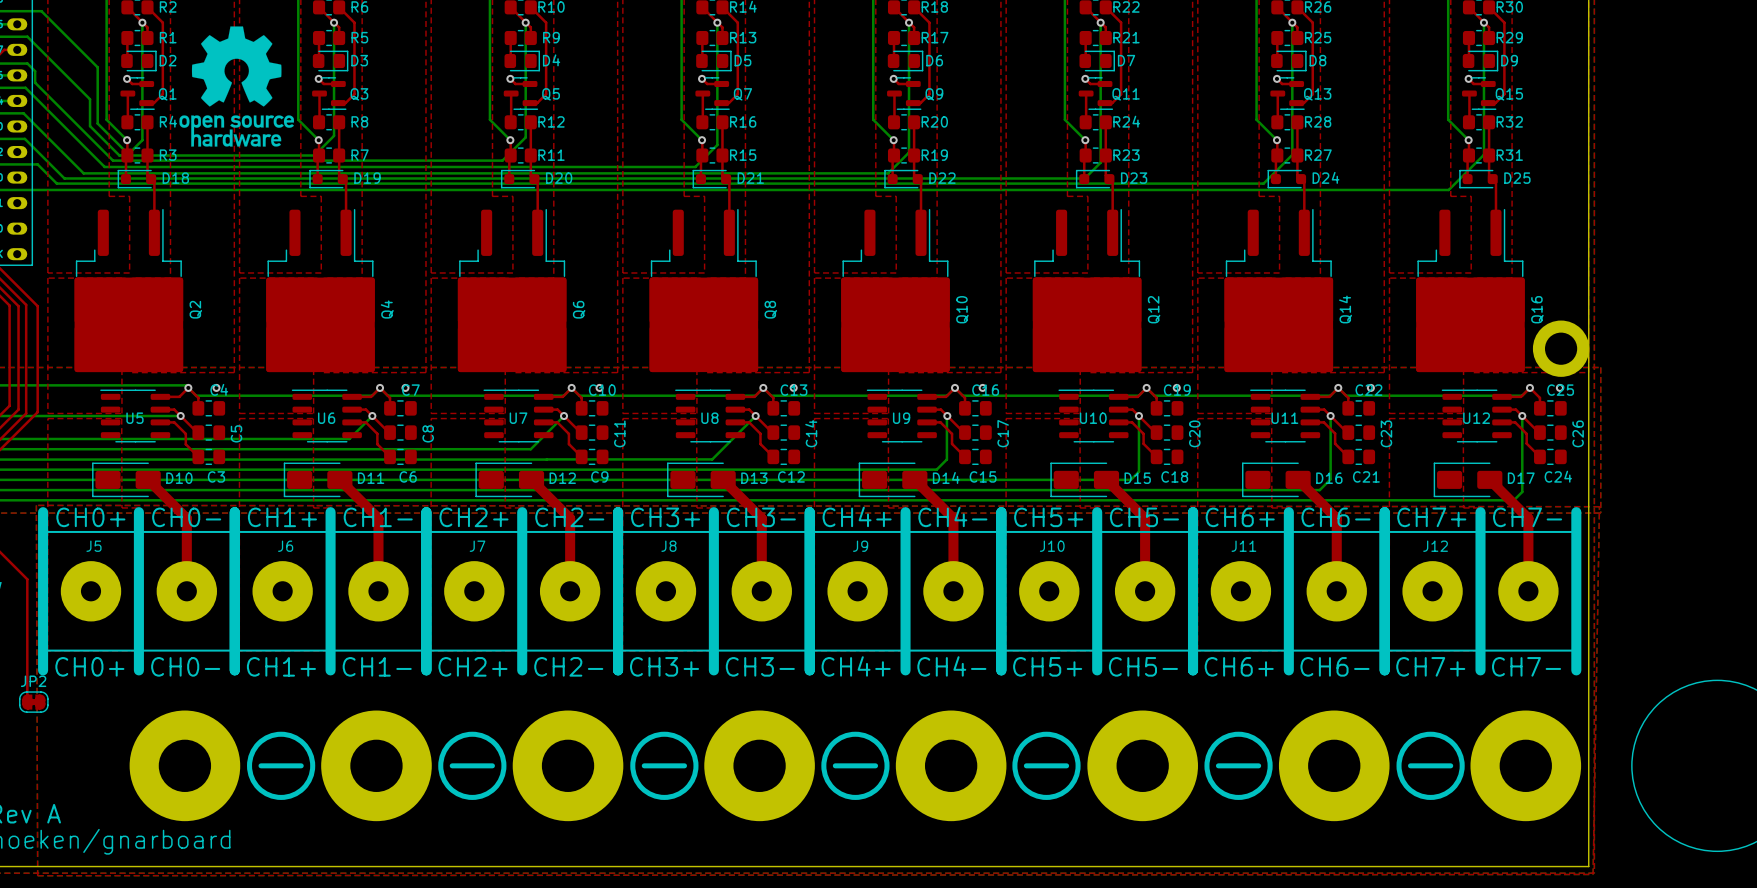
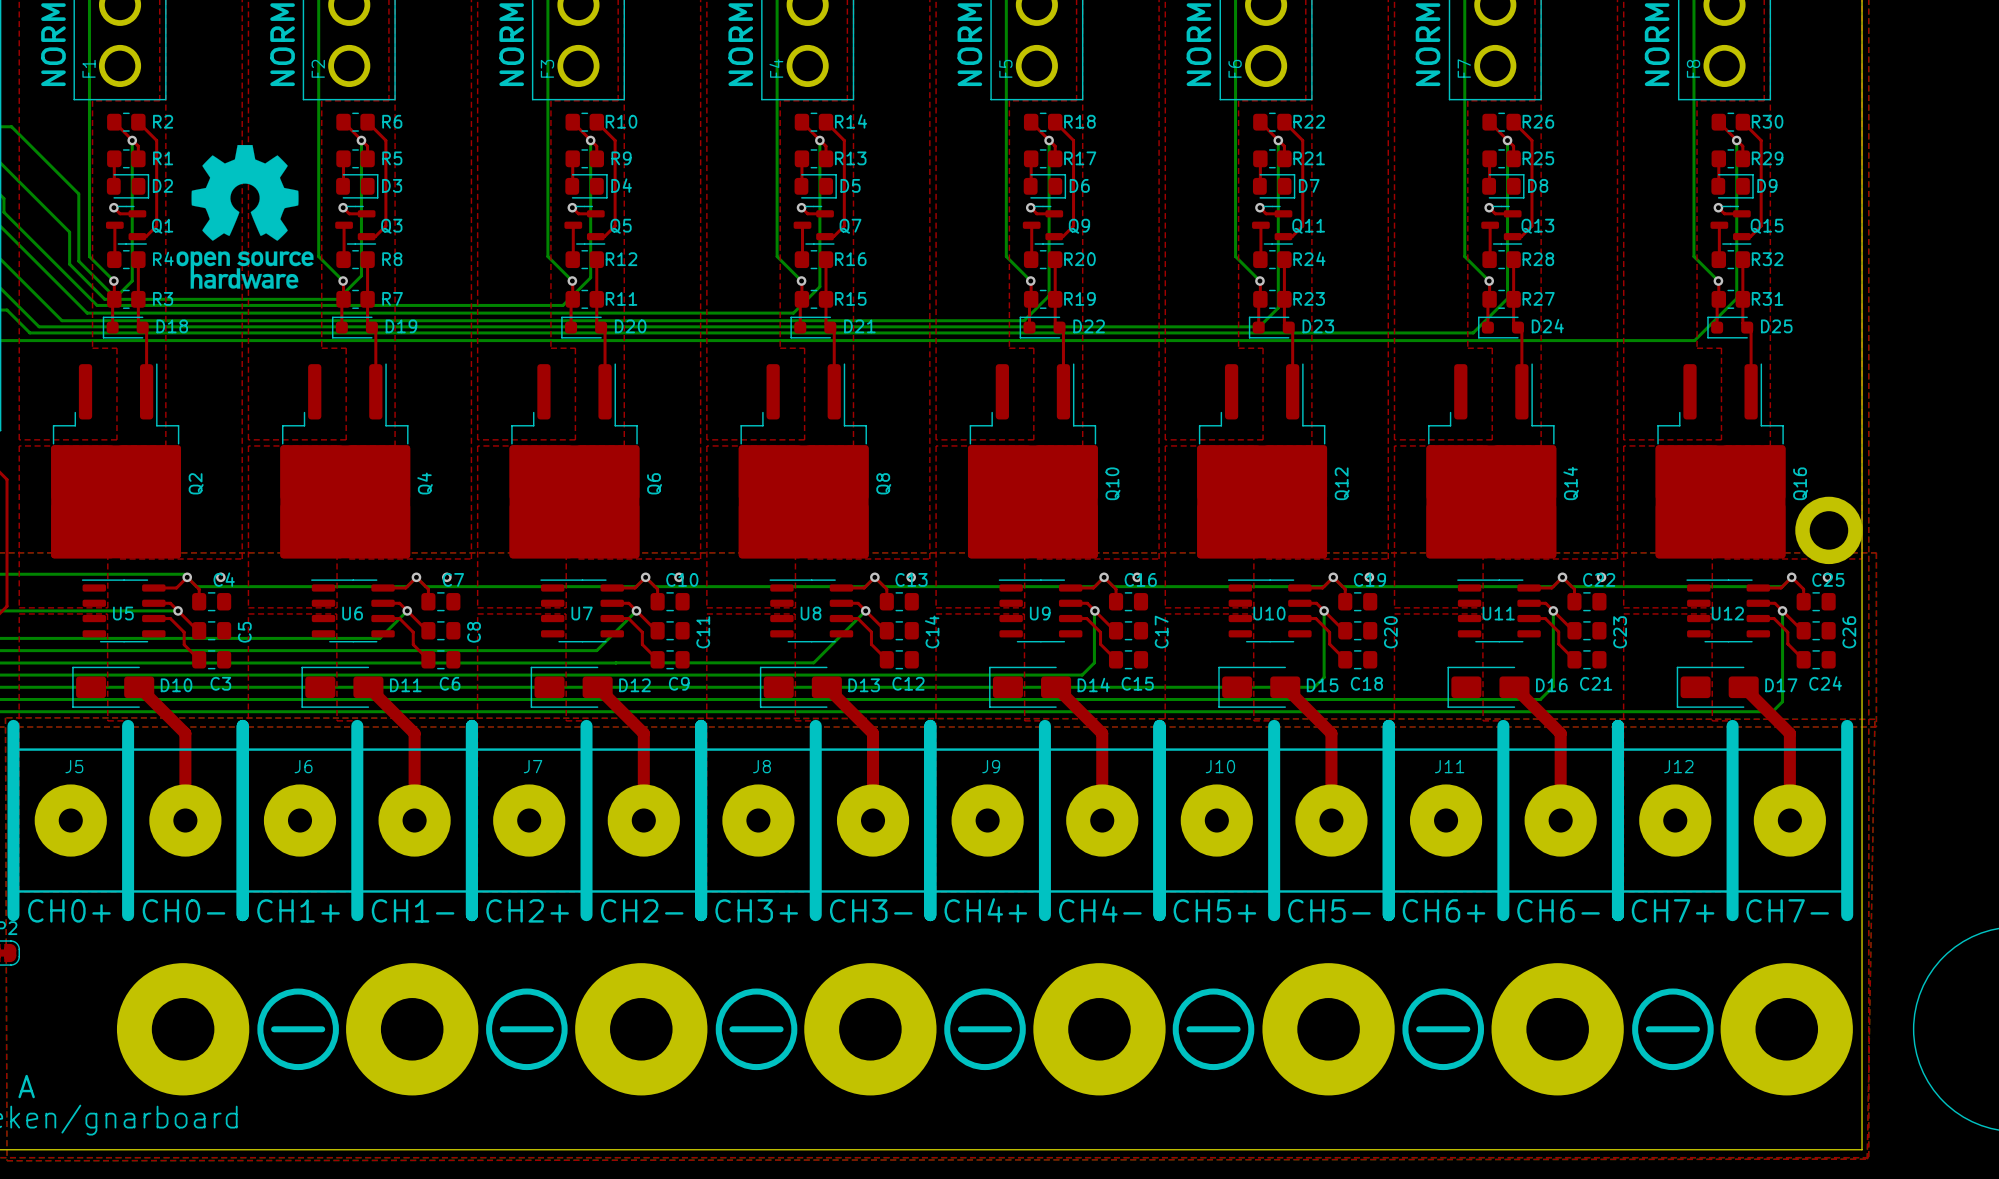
text: CH4+ (857, 516) -> none
text: CH4- (952, 516) -> none
text: CH0+ (90, 517) -> none
text: CH0- (186, 517) -> none
text: CH1+ (282, 517) -> none
text: CH1- (378, 517) -> none
text: CH2+ (474, 517) -> none
text: CH2- (569, 517) -> none
text: CH3+ (665, 517) -> none
text: CH3- (761, 517) -> none
text: CH5+ (1048, 517) -> none
text: CH5- (1144, 517) -> none
text: CH6+ (1240, 517) -> none
text: CH6- (1335, 517) -> none
text: CH7+ (1431, 517) -> none
text: CH7- (1527, 517) -> none

